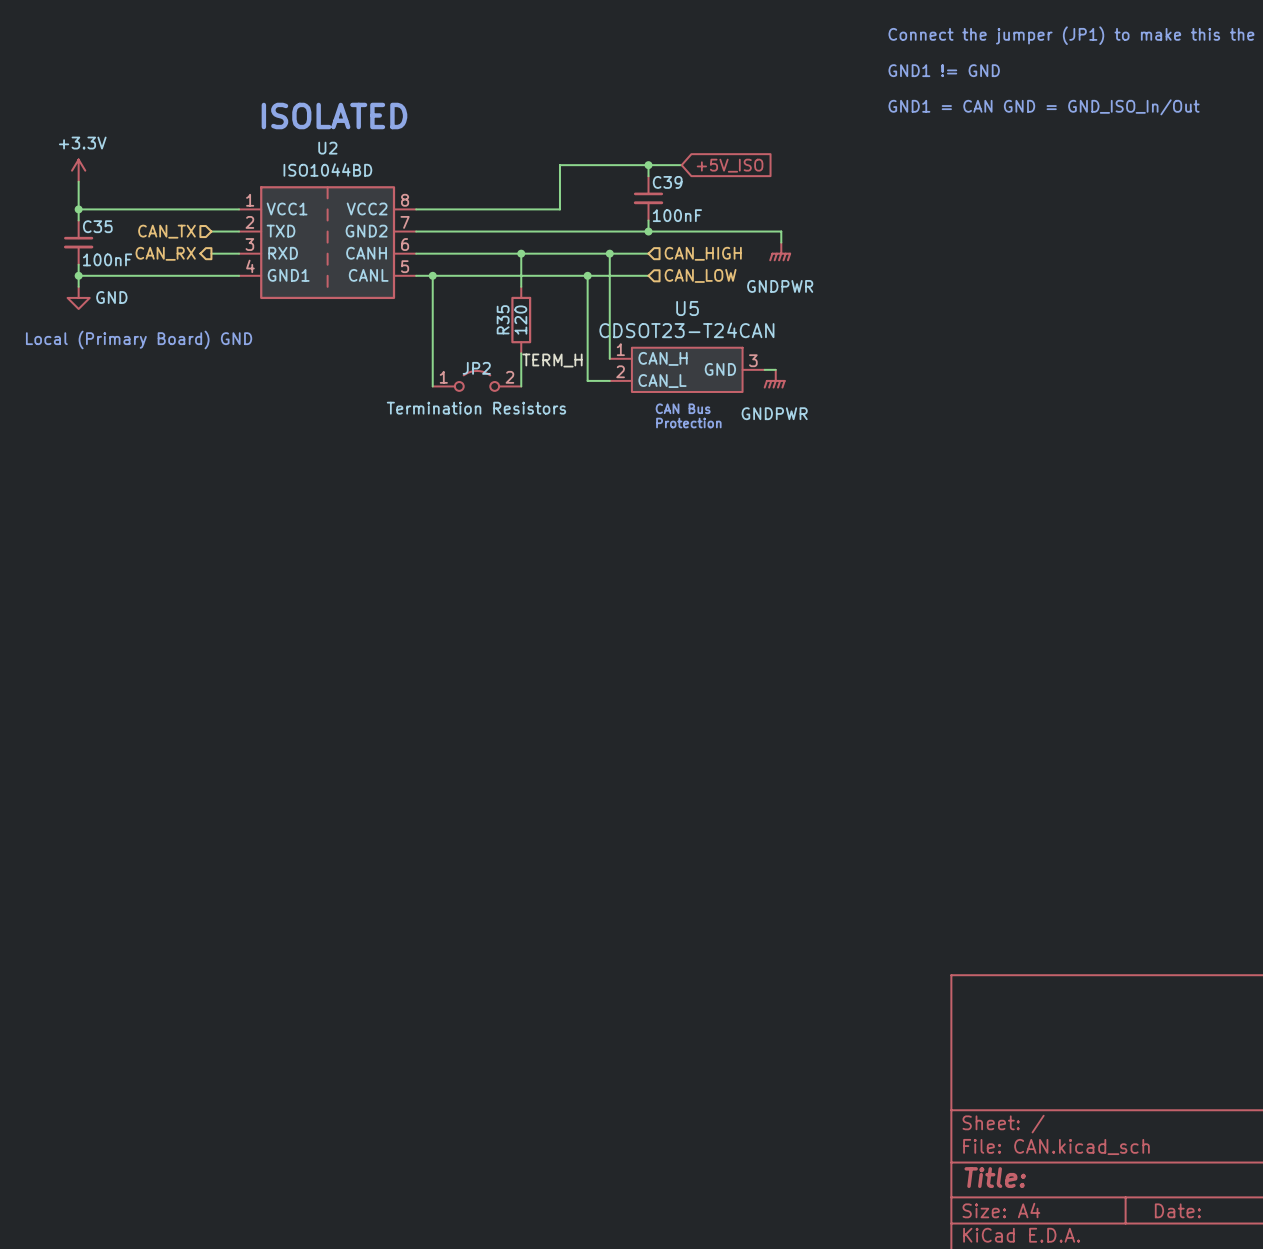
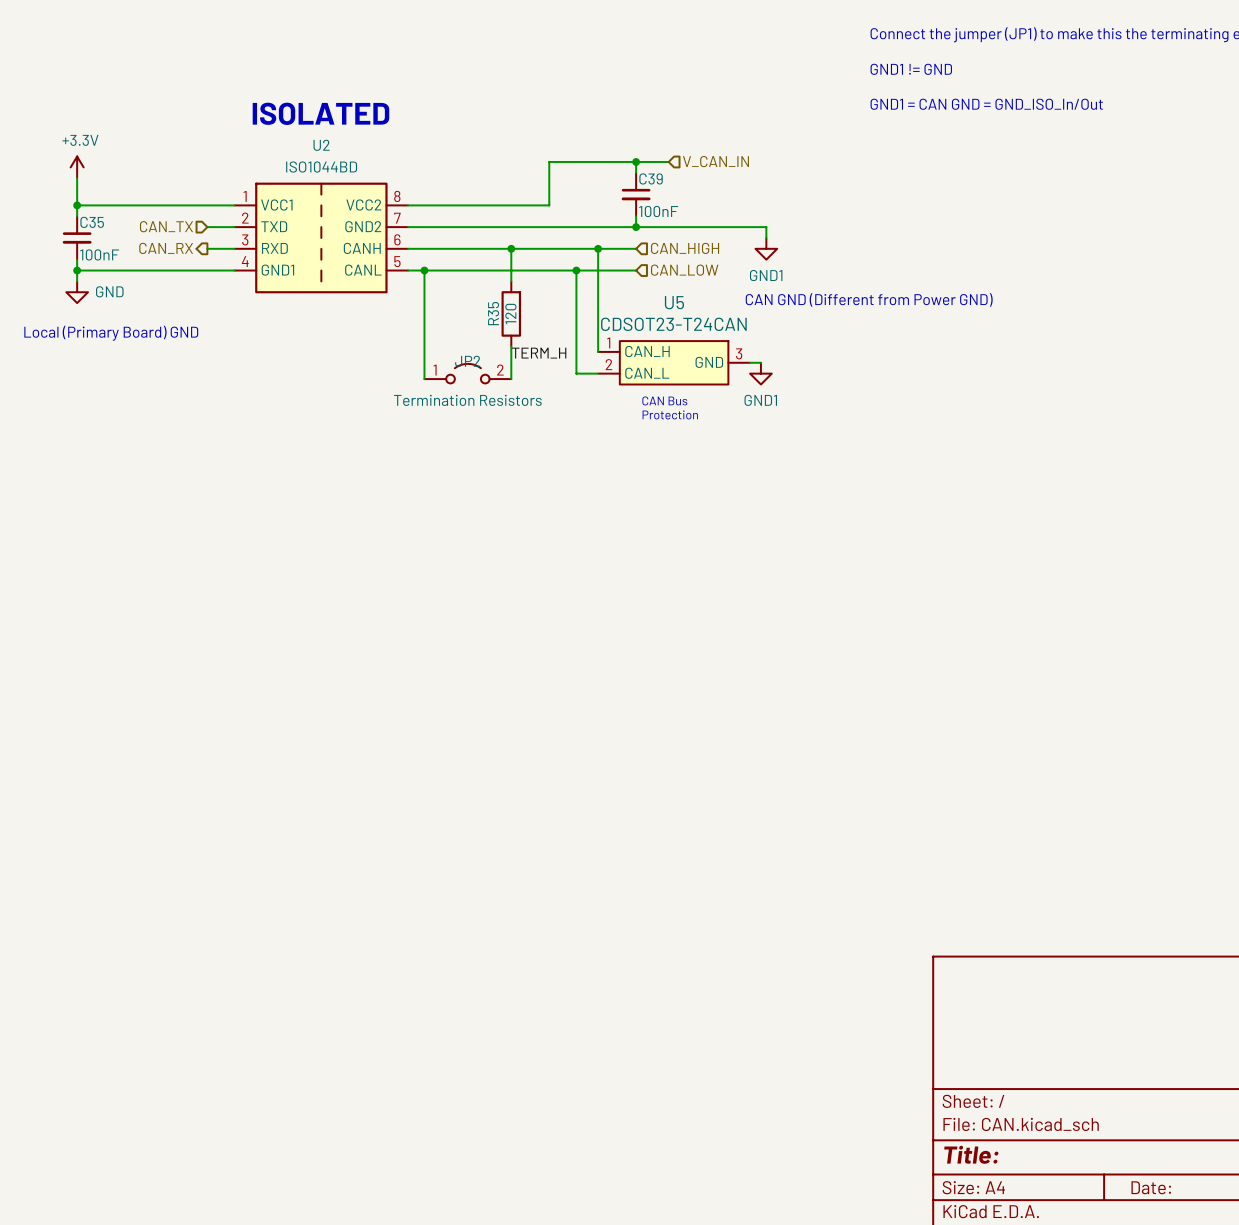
global label: +5V_ISO (730, 165) -> none
hierarchical label: none -> V_CAN_IN (715, 161)
power symbol: GNDPWR (780, 251) -> GND1 (766, 248)
text: none -> CAN GND (Different from Power GND) (869, 299)
power symbol: GNDPWR (774, 379) -> GND1 (760, 373)

